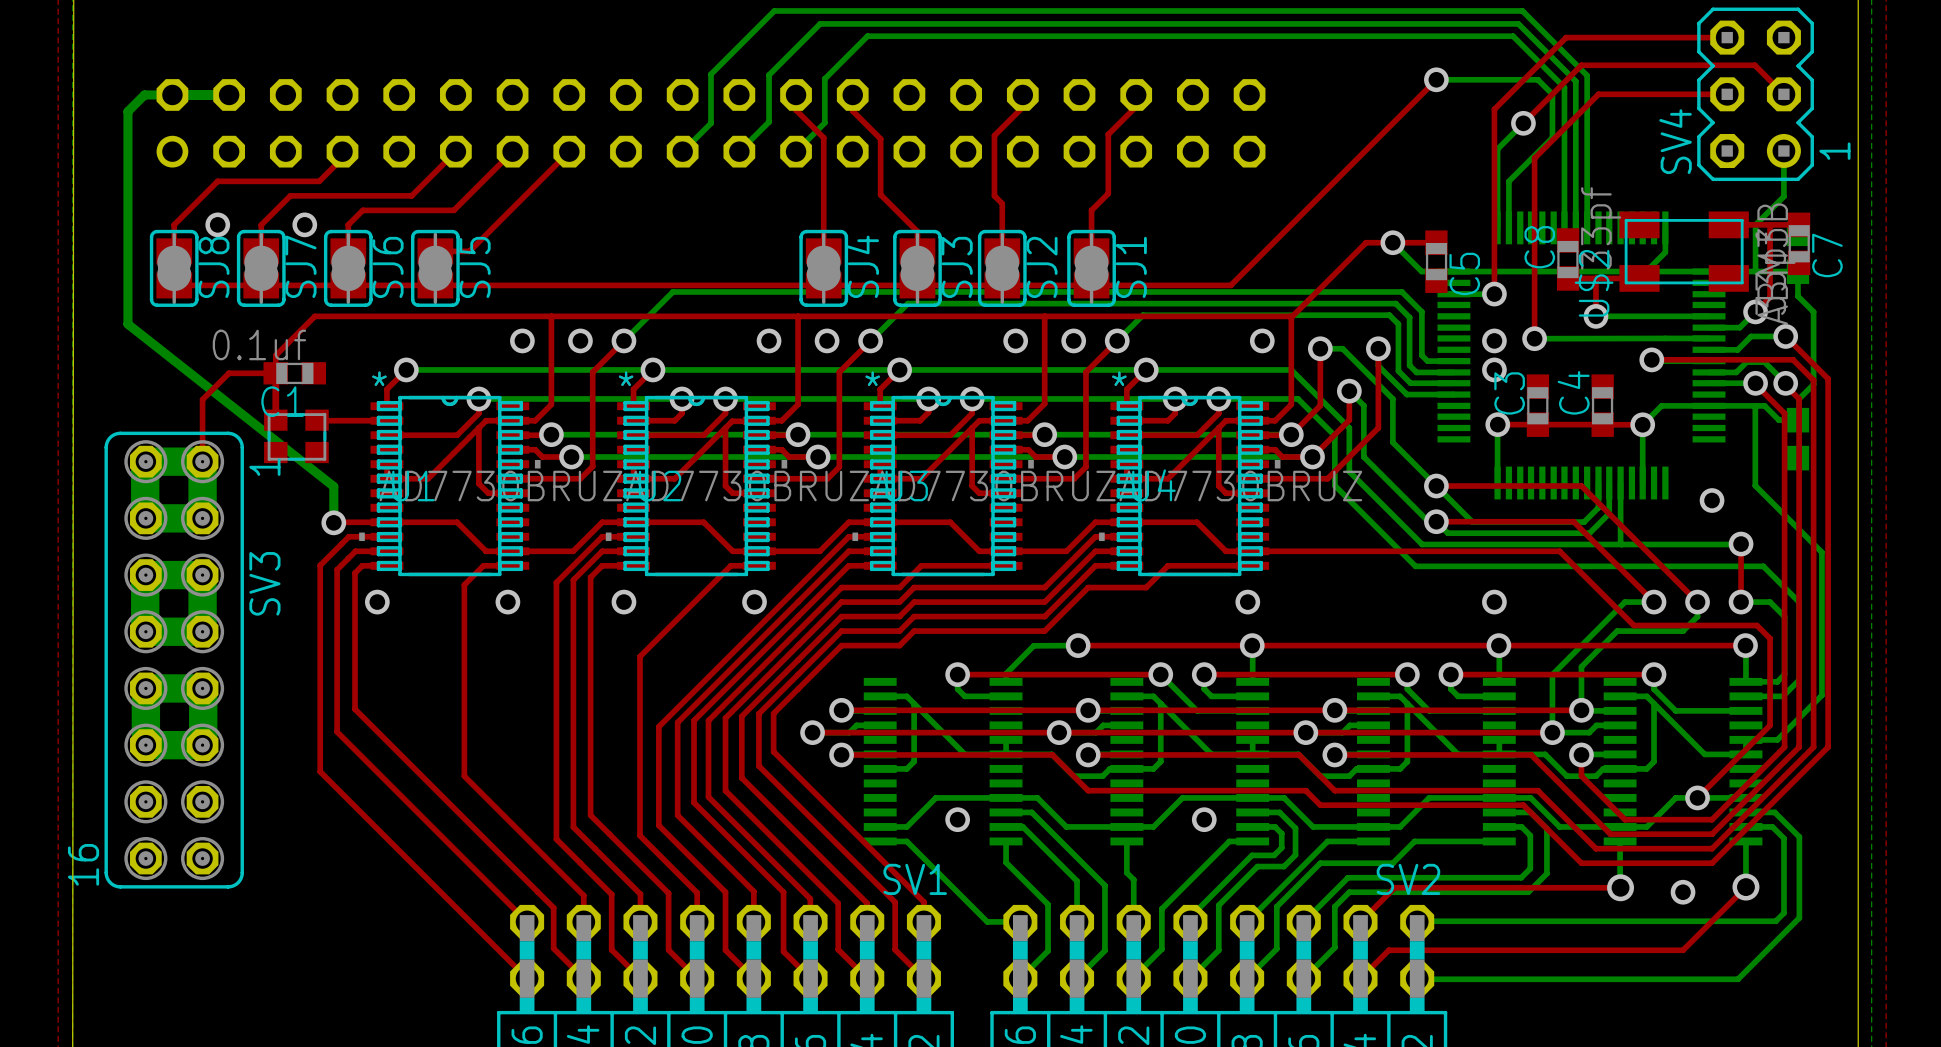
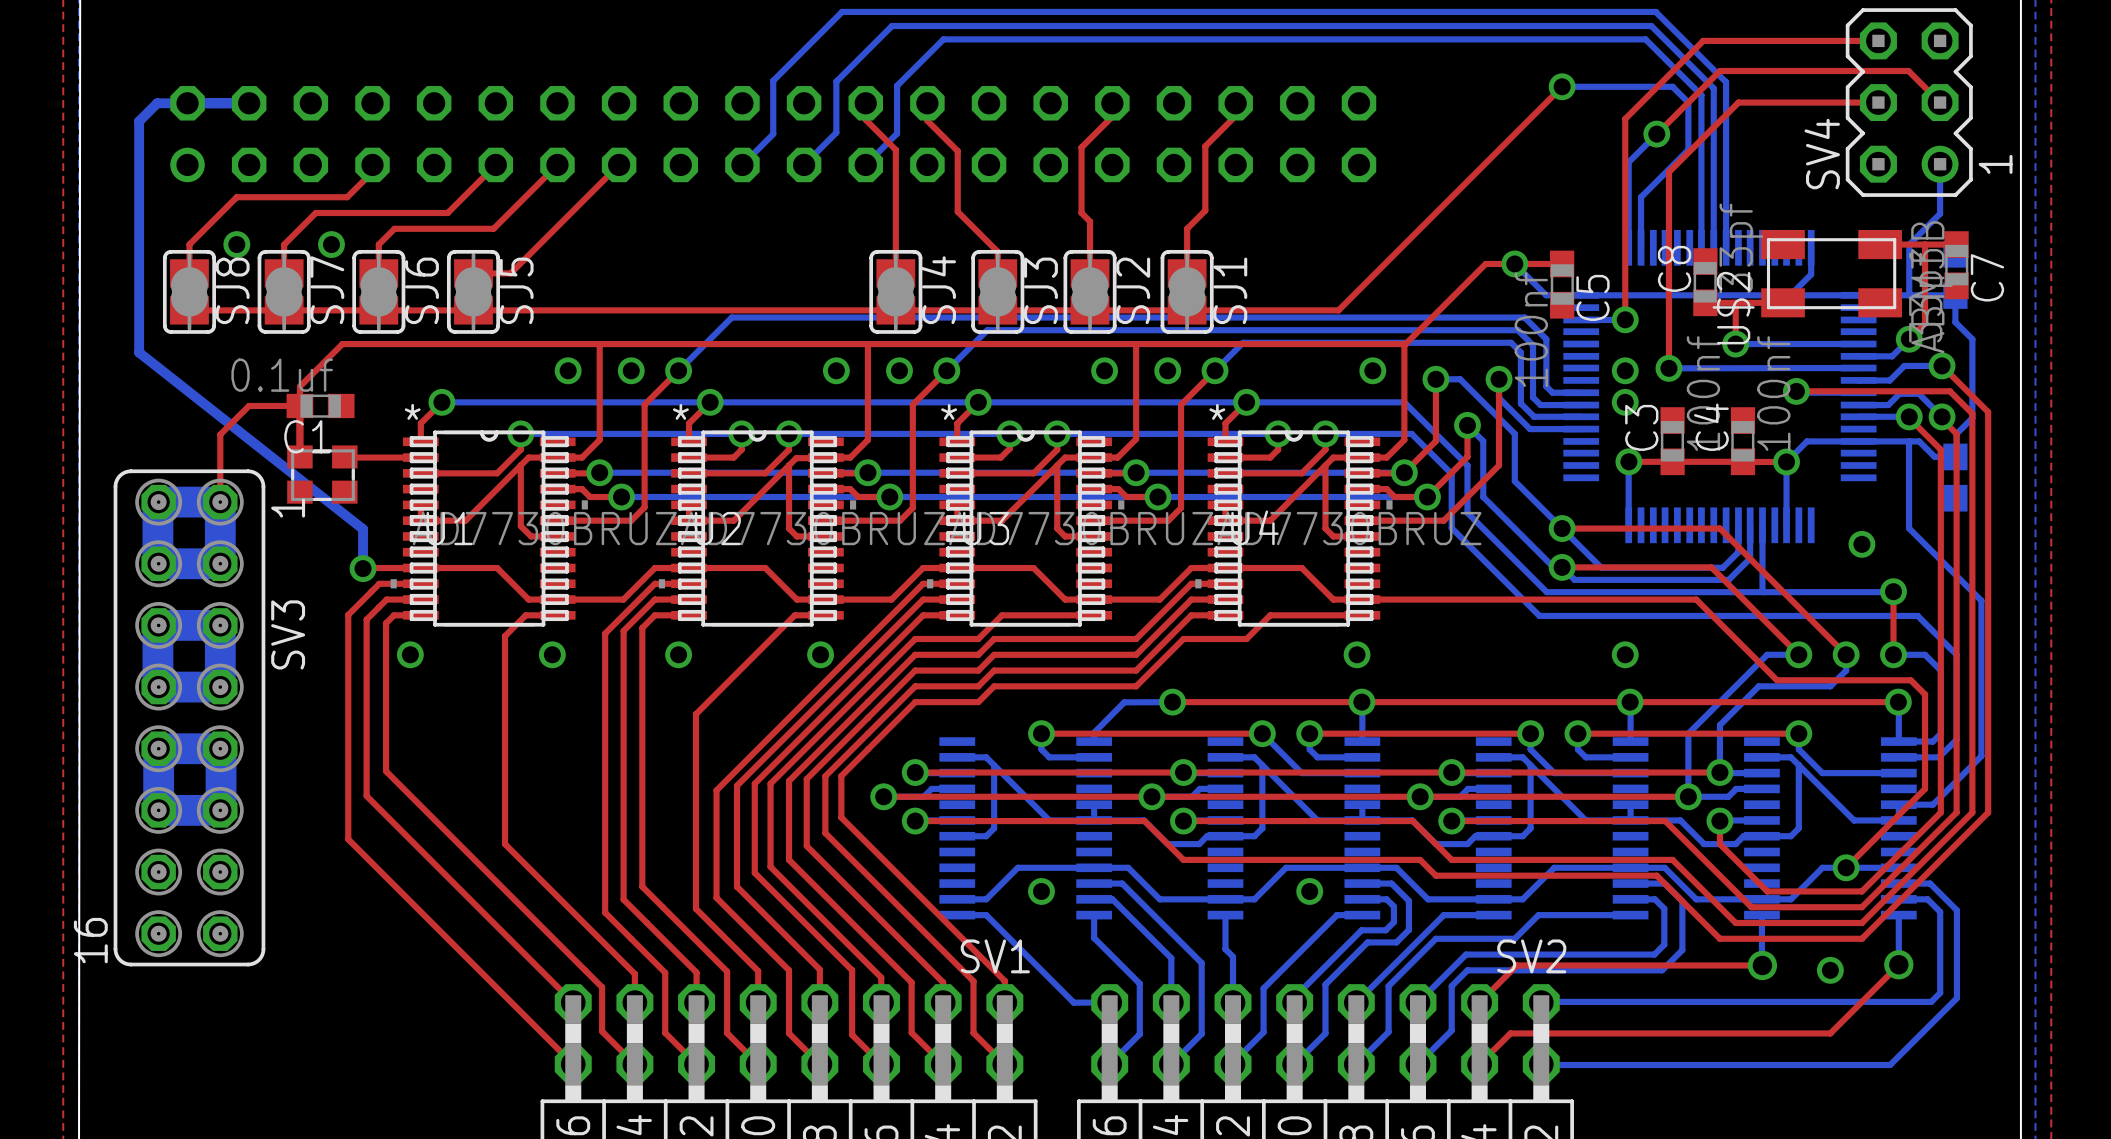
C5 value: none -> 100nf (1531, 329)
C3 value: none -> 100nf (1703, 393)
C4 value: none -> 100nf (1773, 393)

